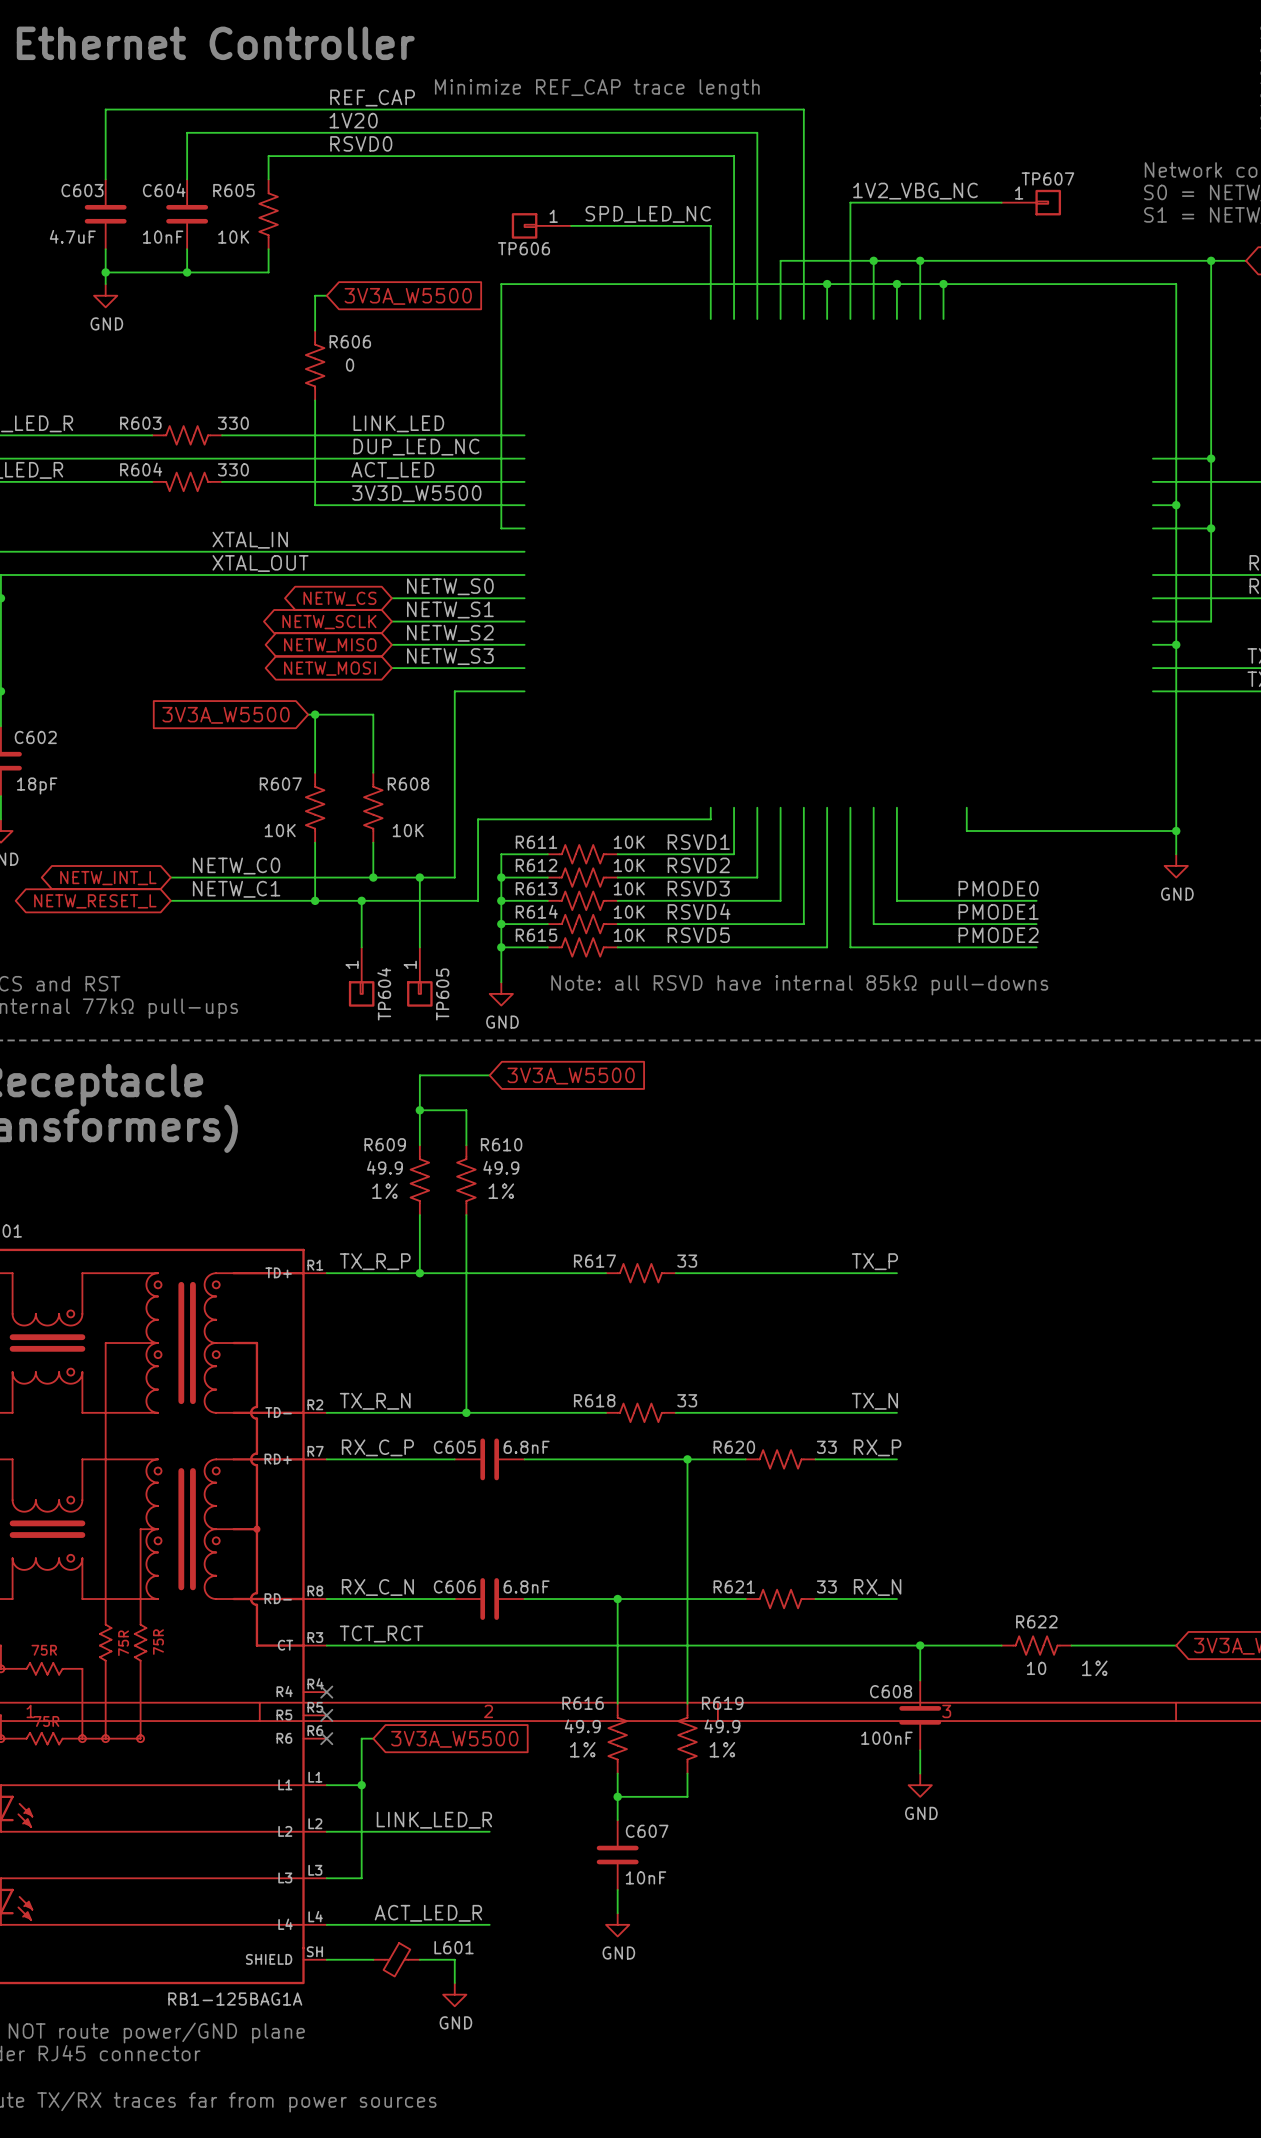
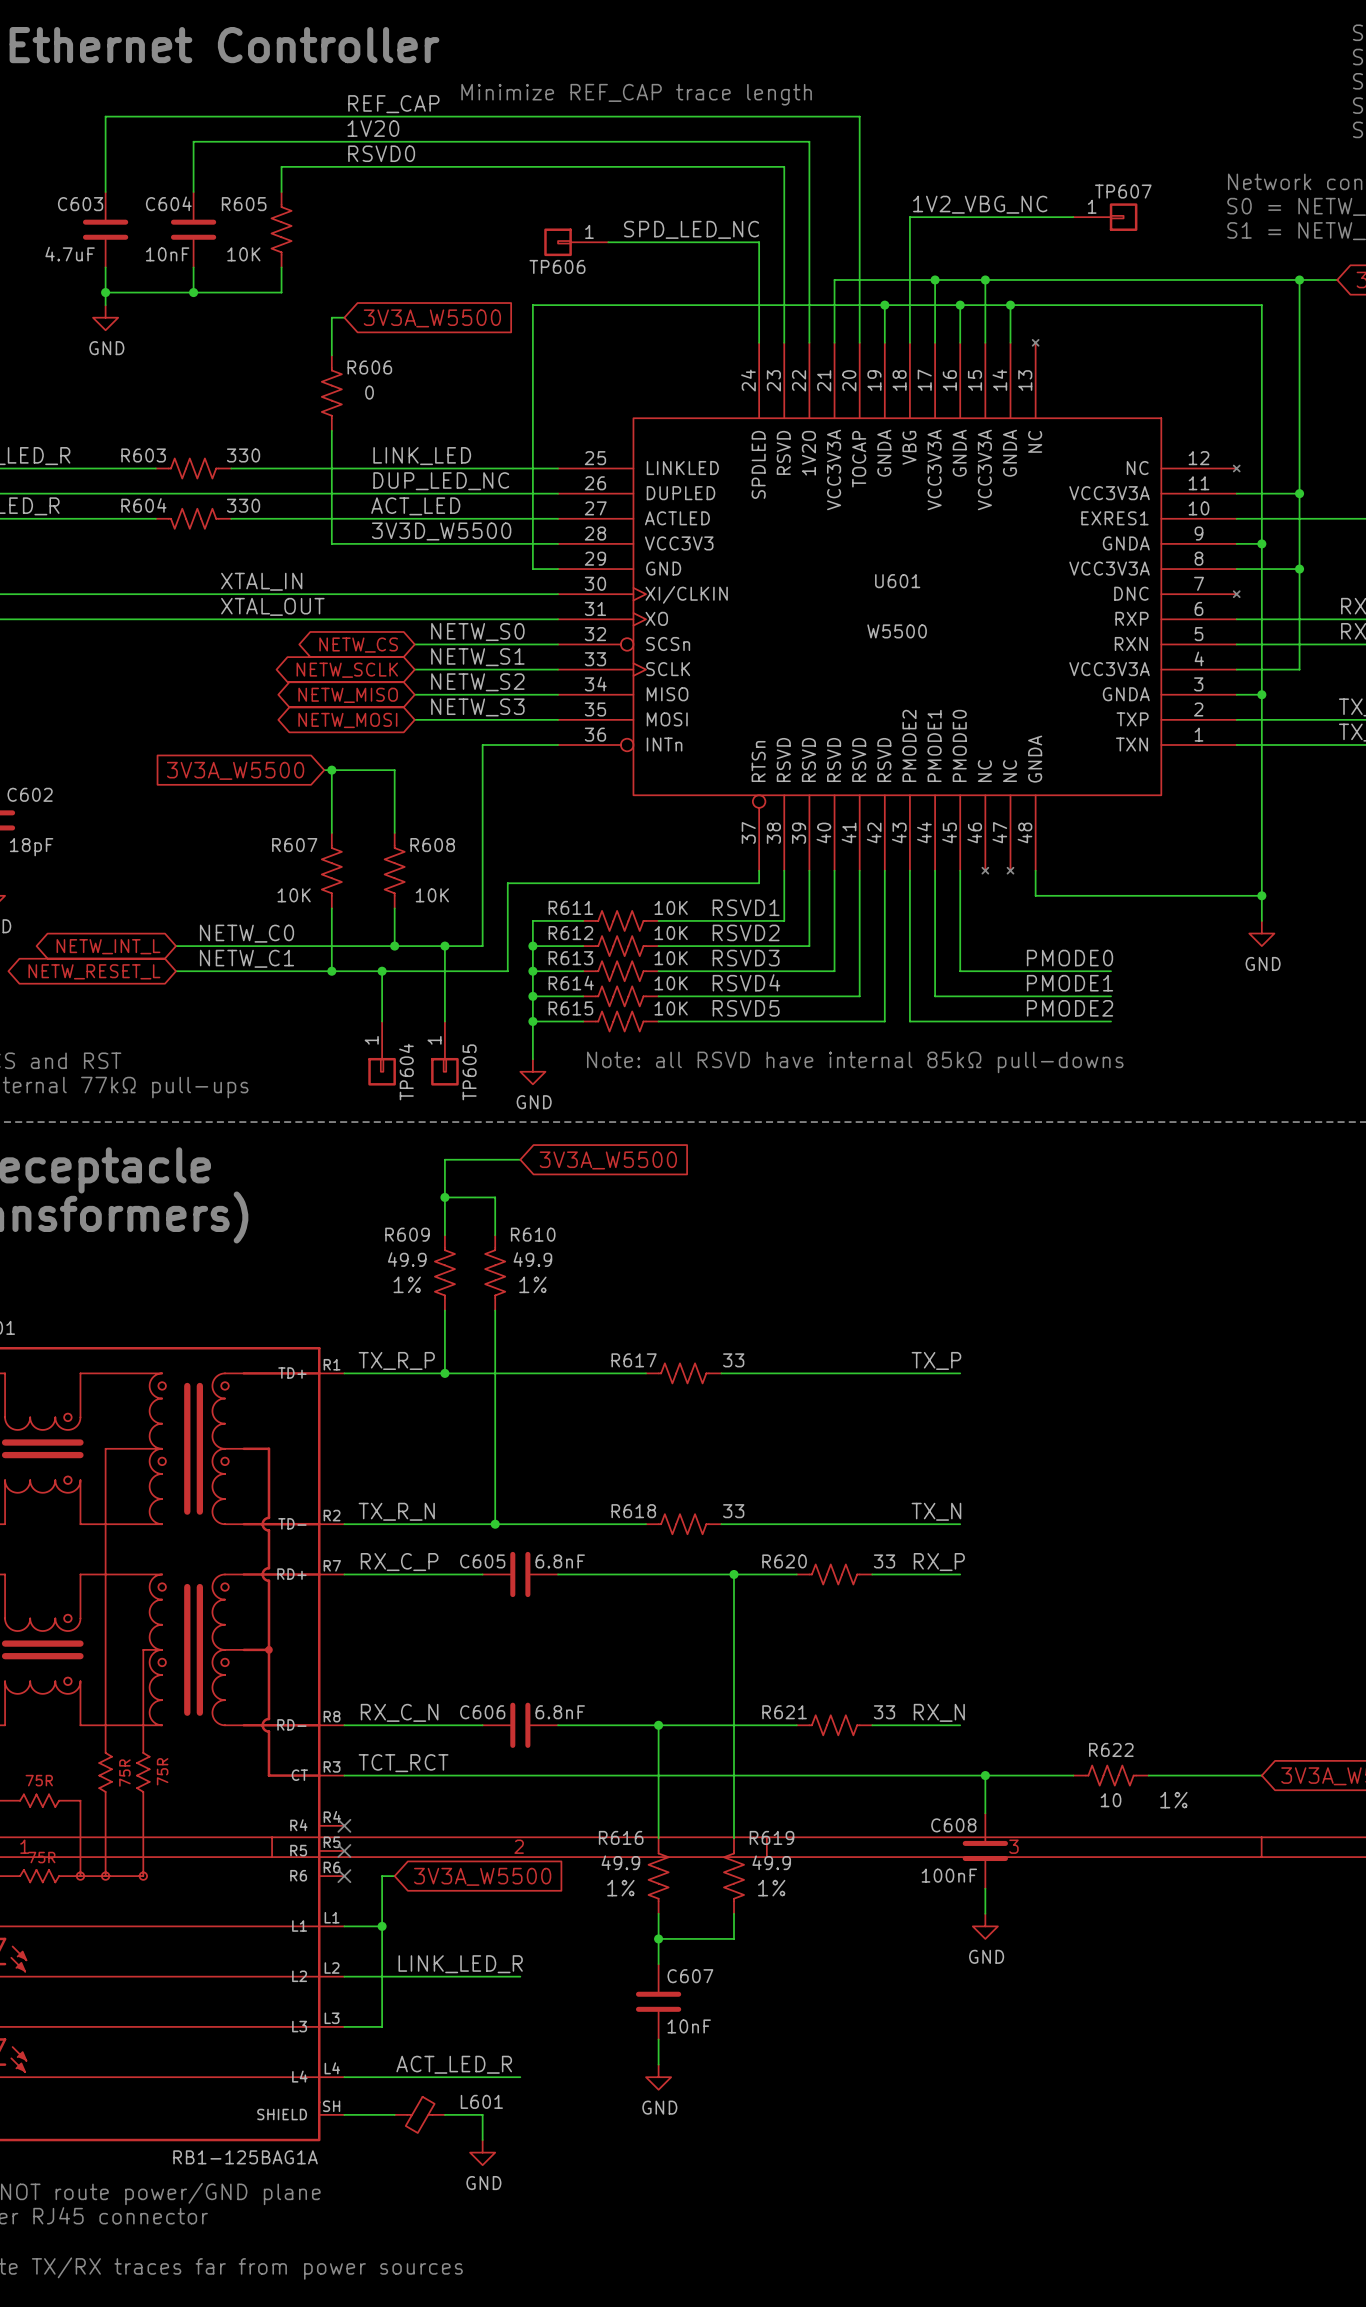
U601: none -> W5500 (898, 606)

